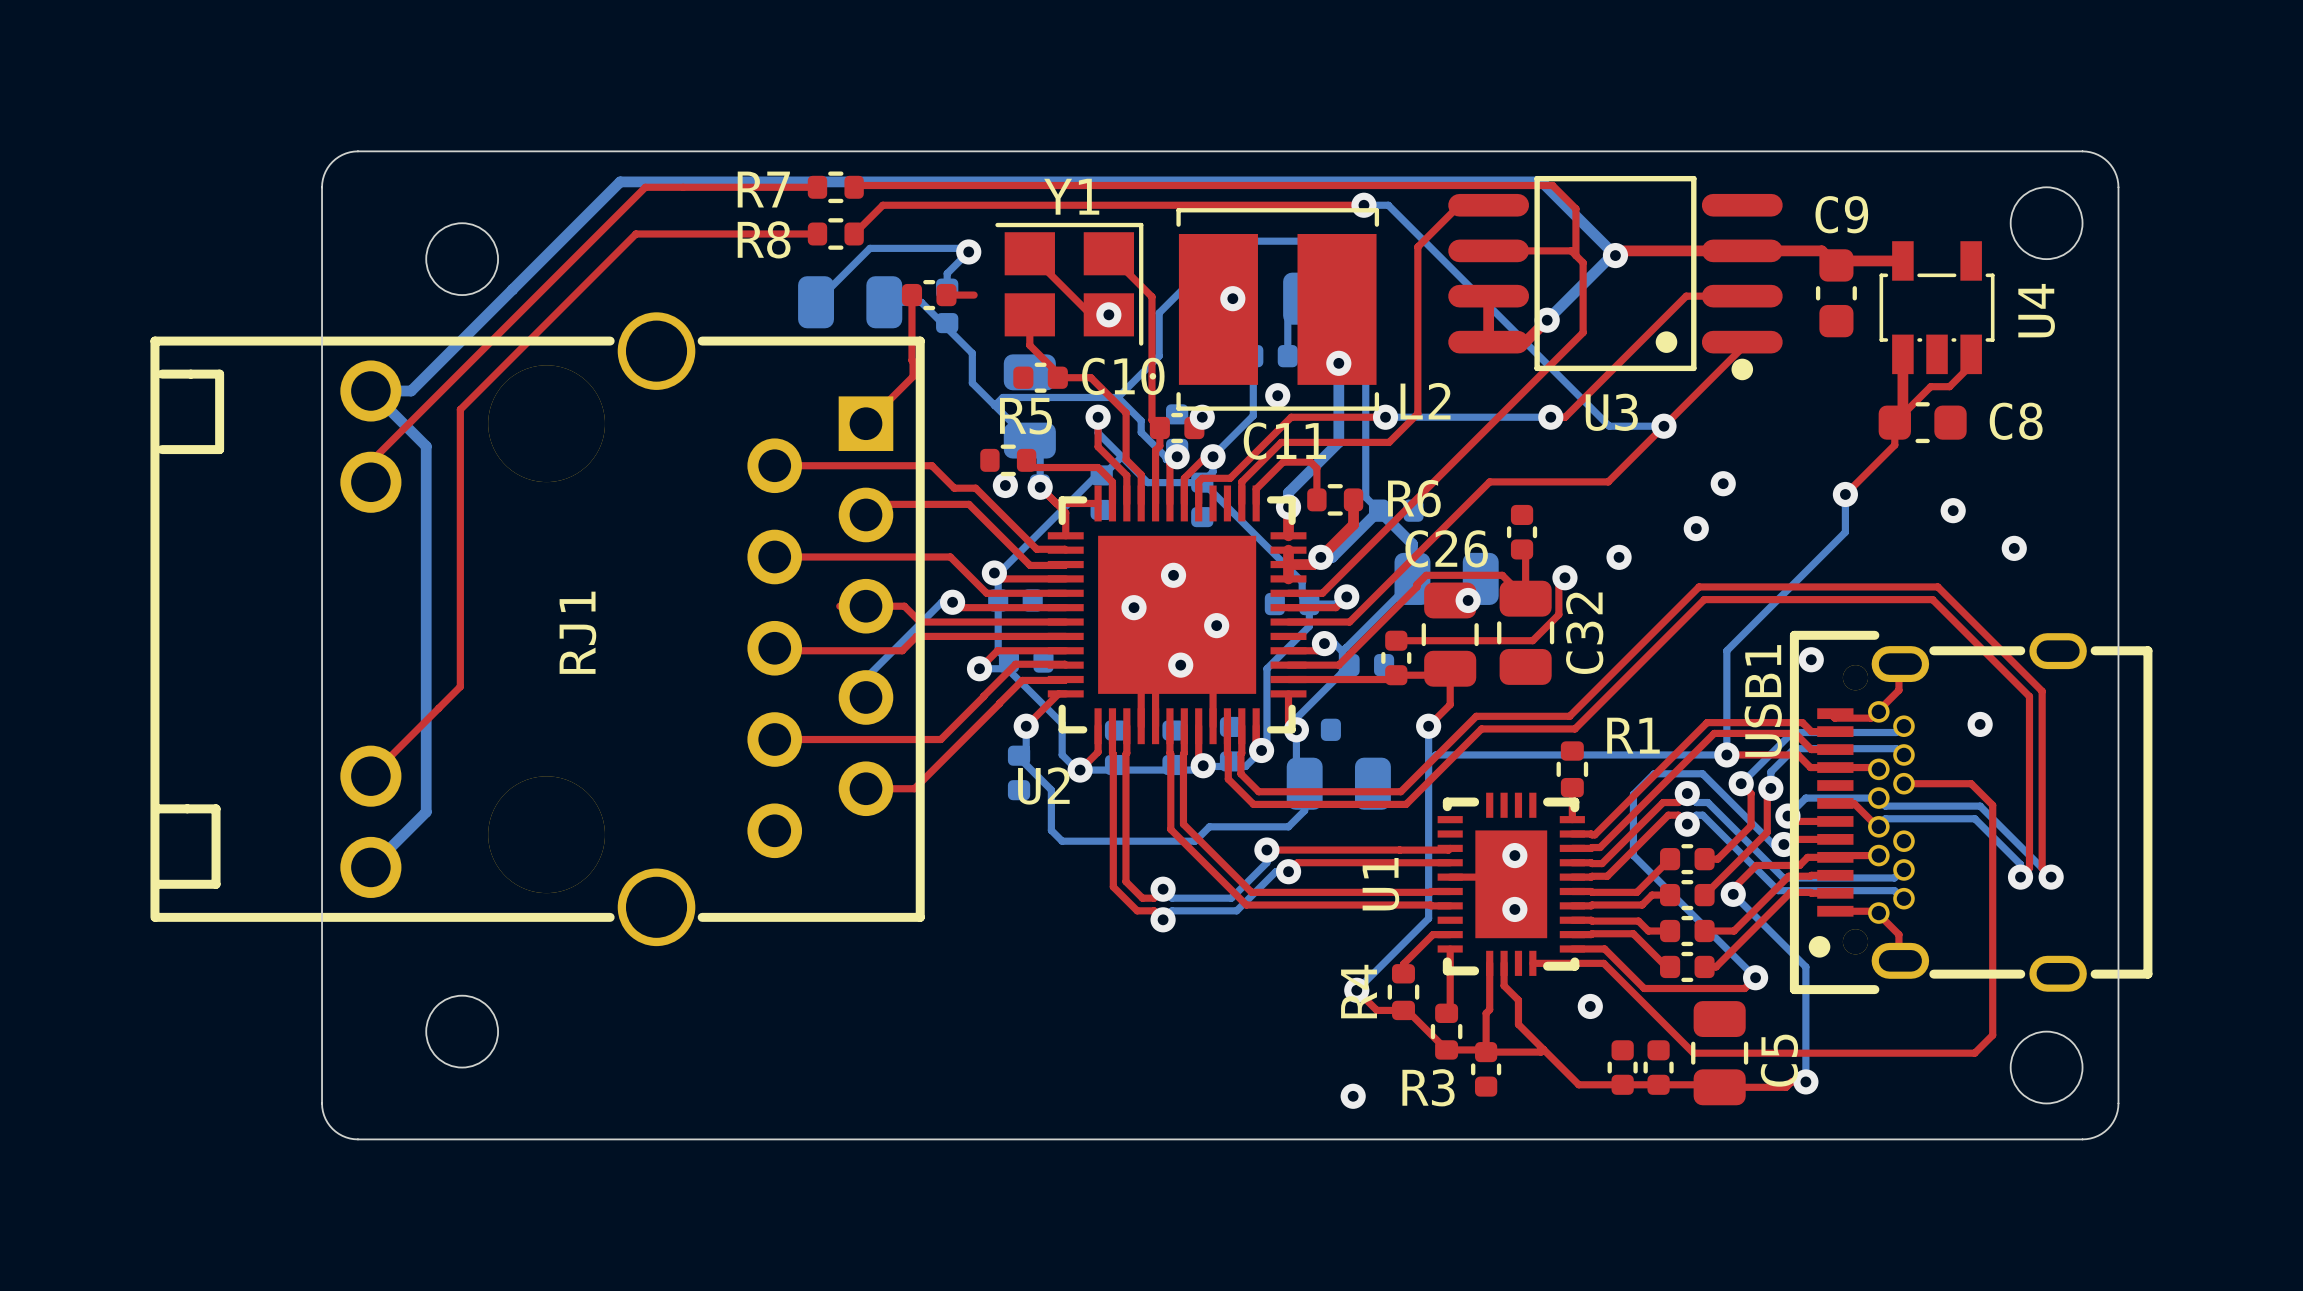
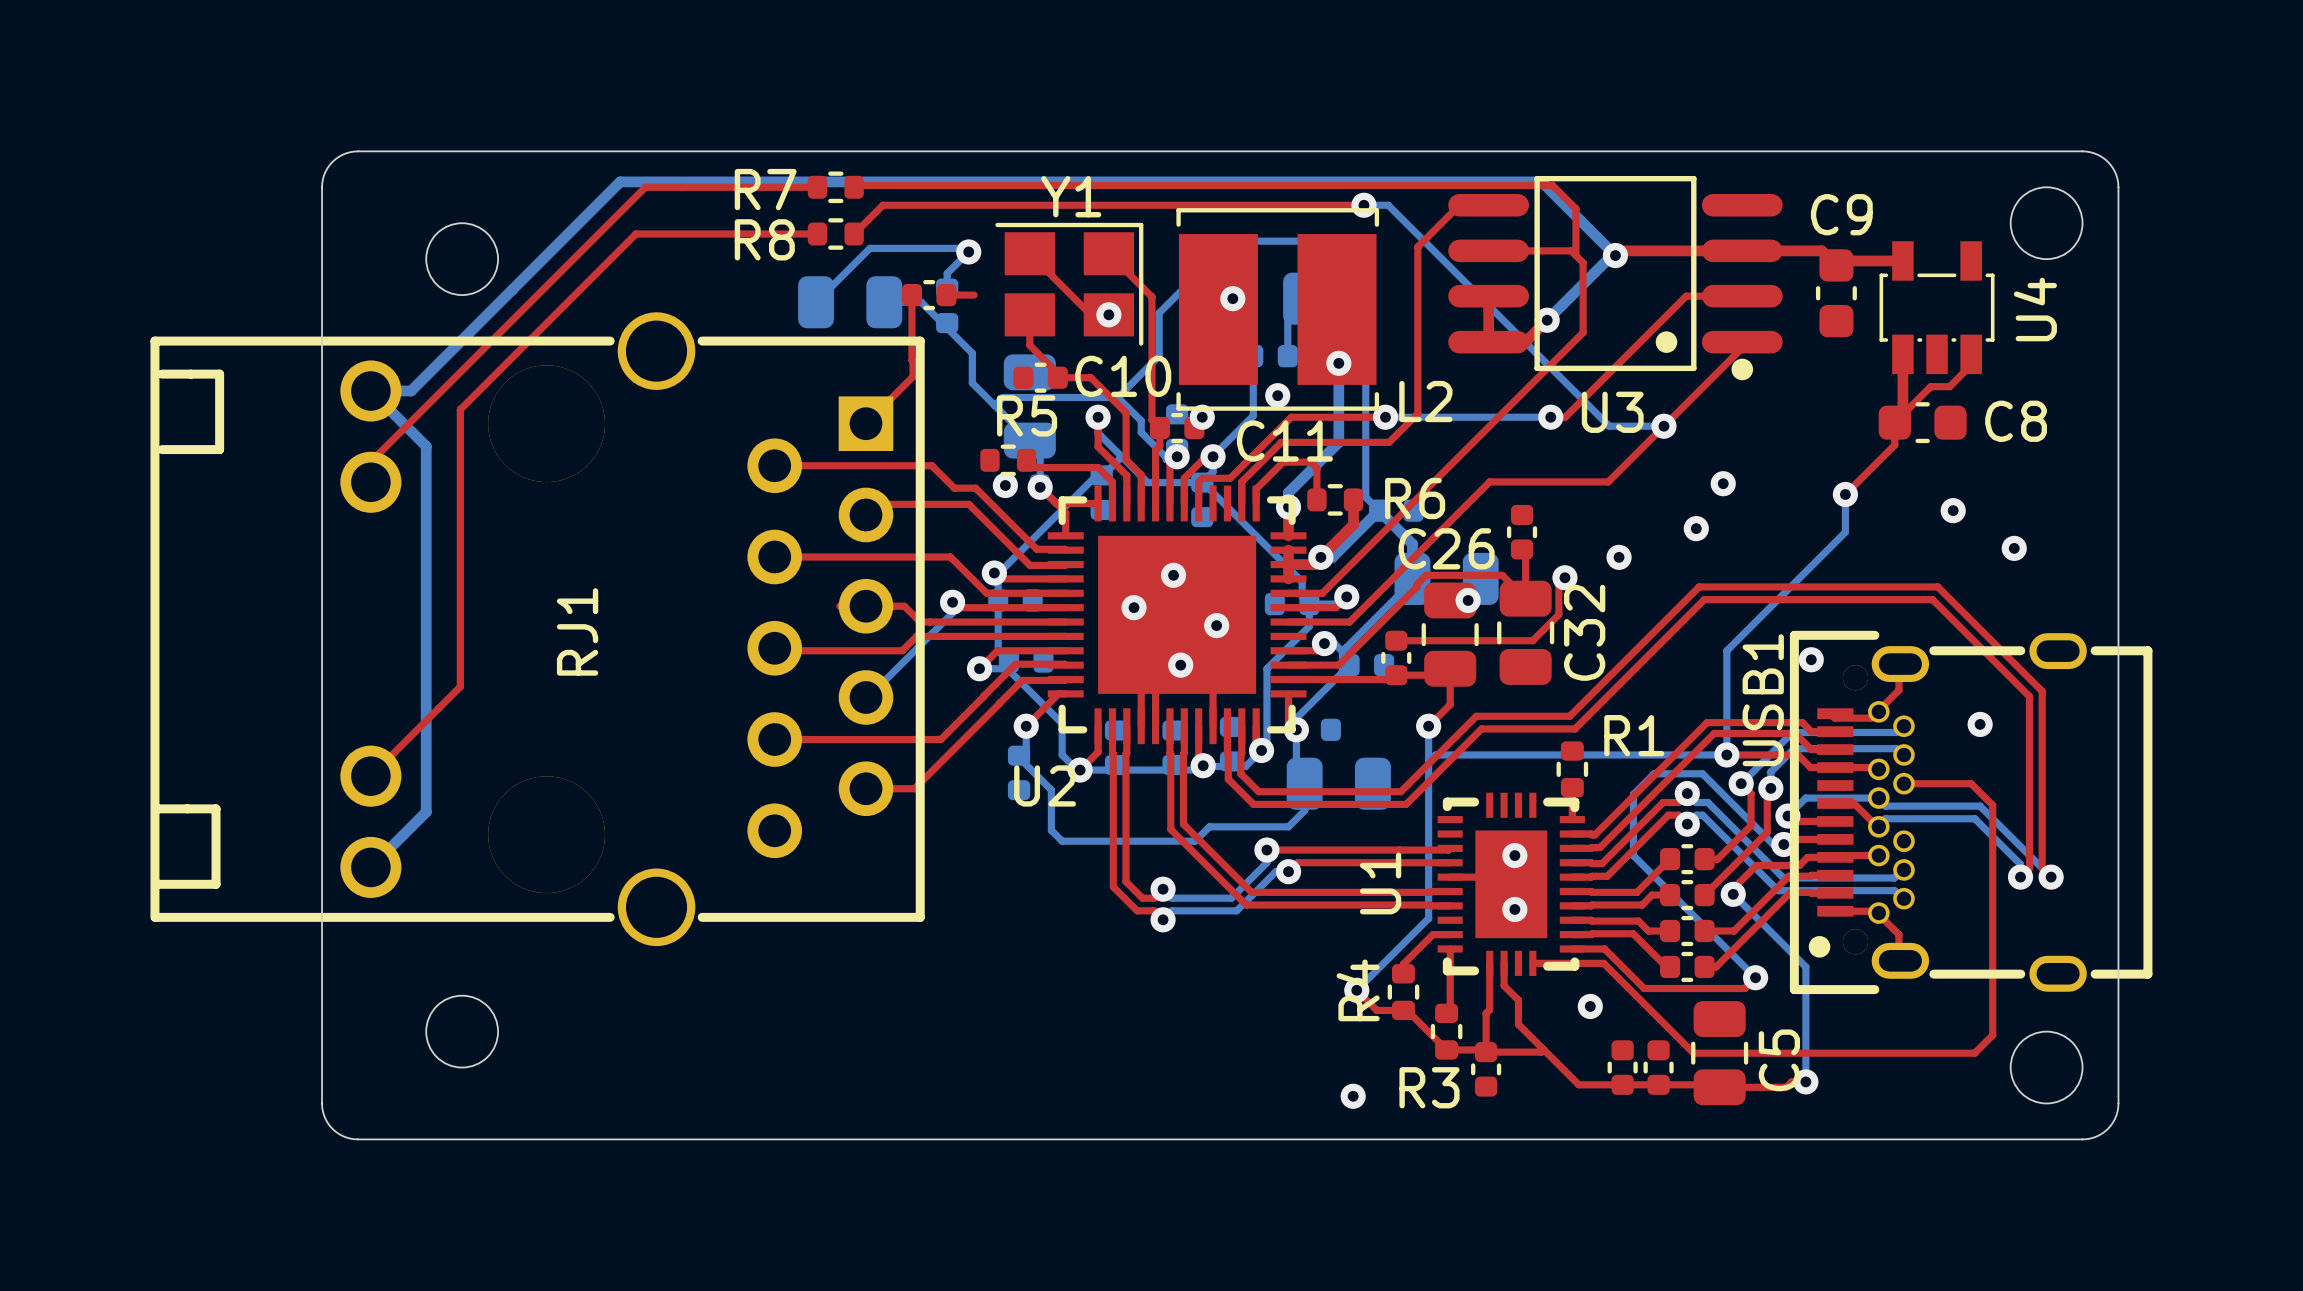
bottom track: (952, 602) (941, 602) (865, 678) (865, 697) -> (952, 602) (952, 613) (868, 697) (865, 697)

